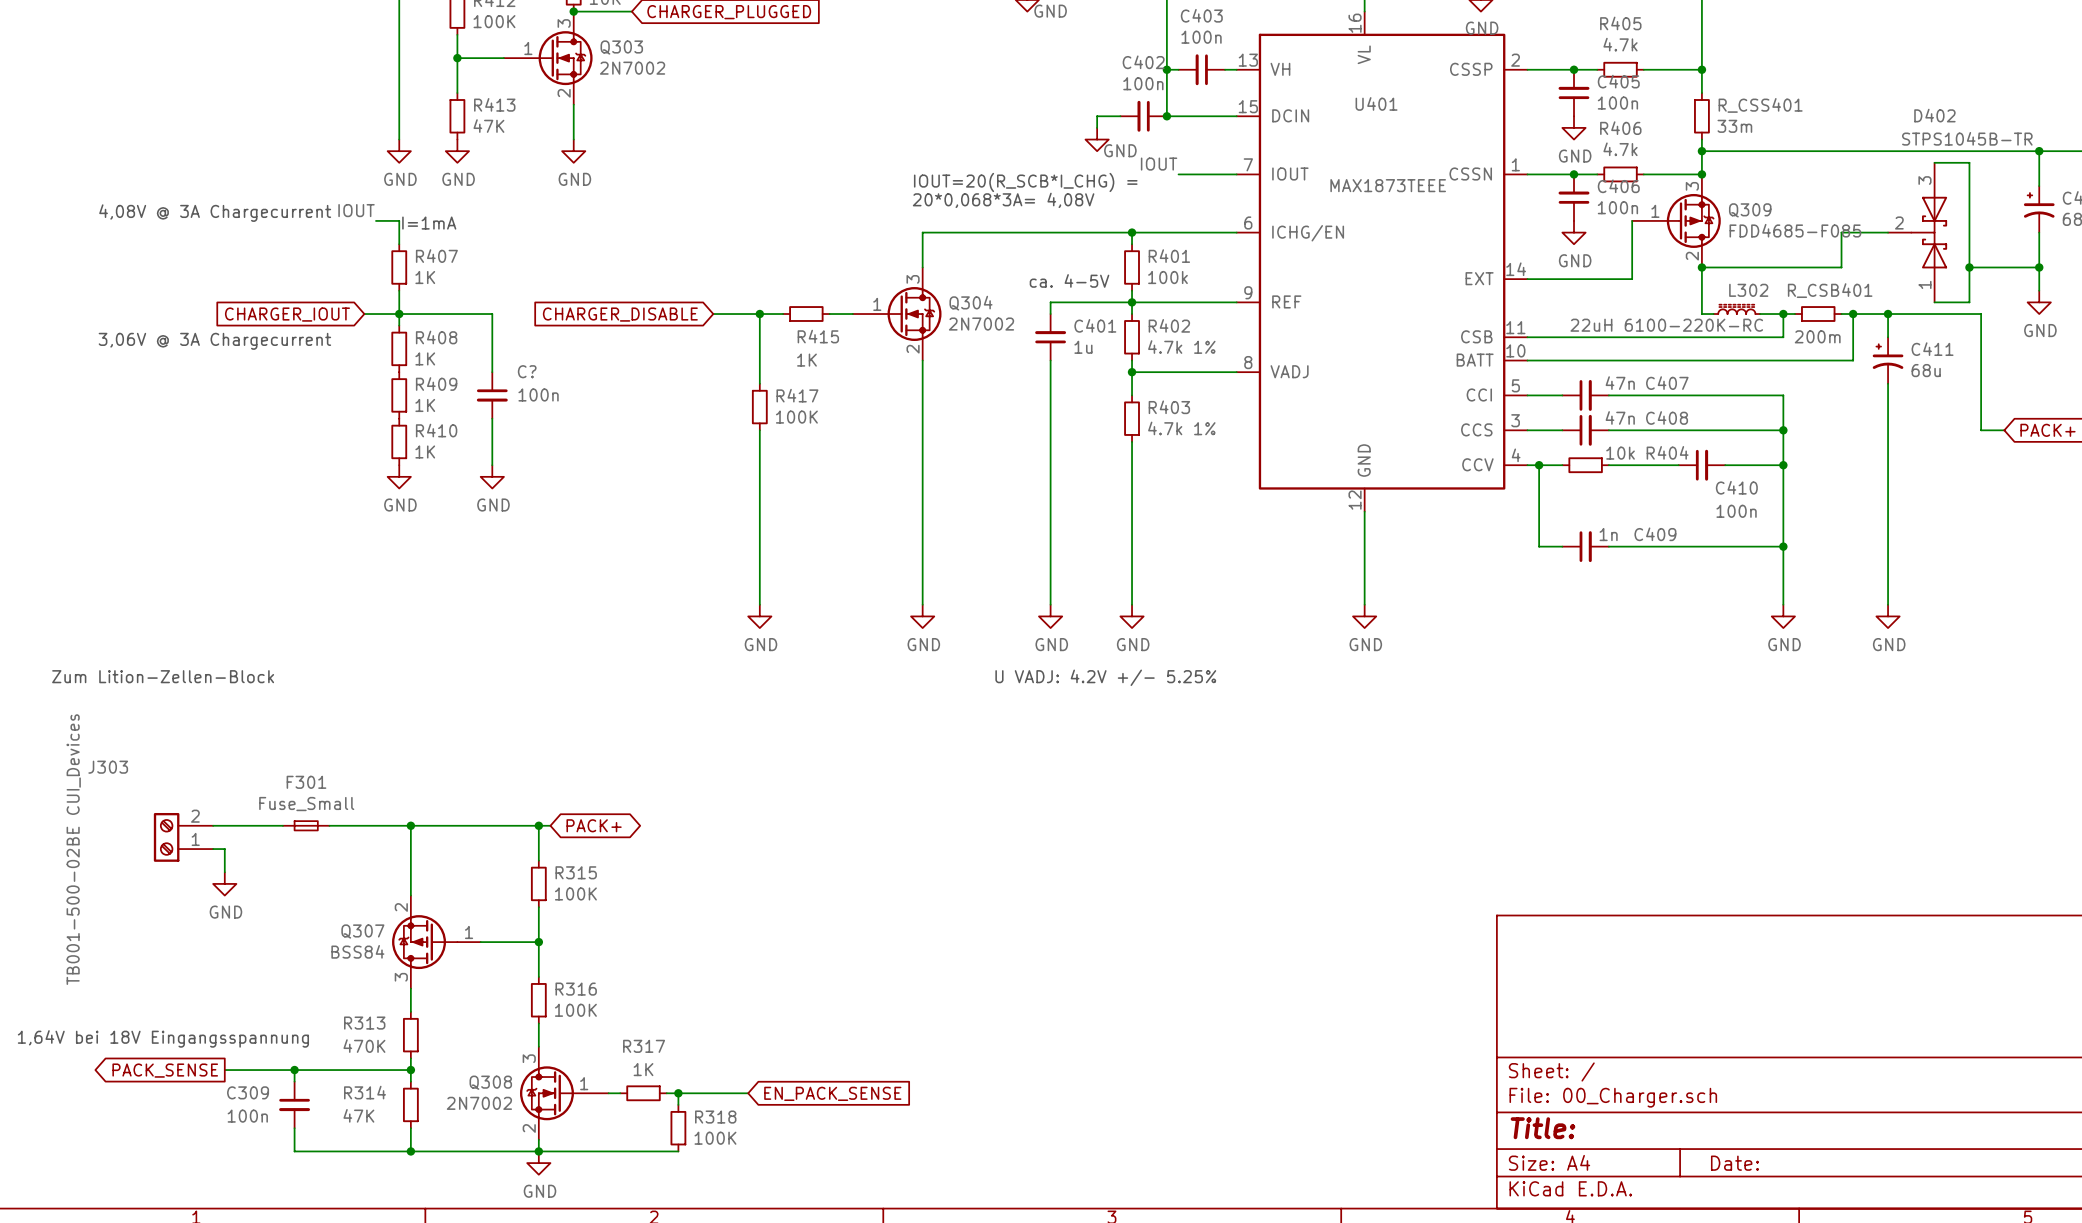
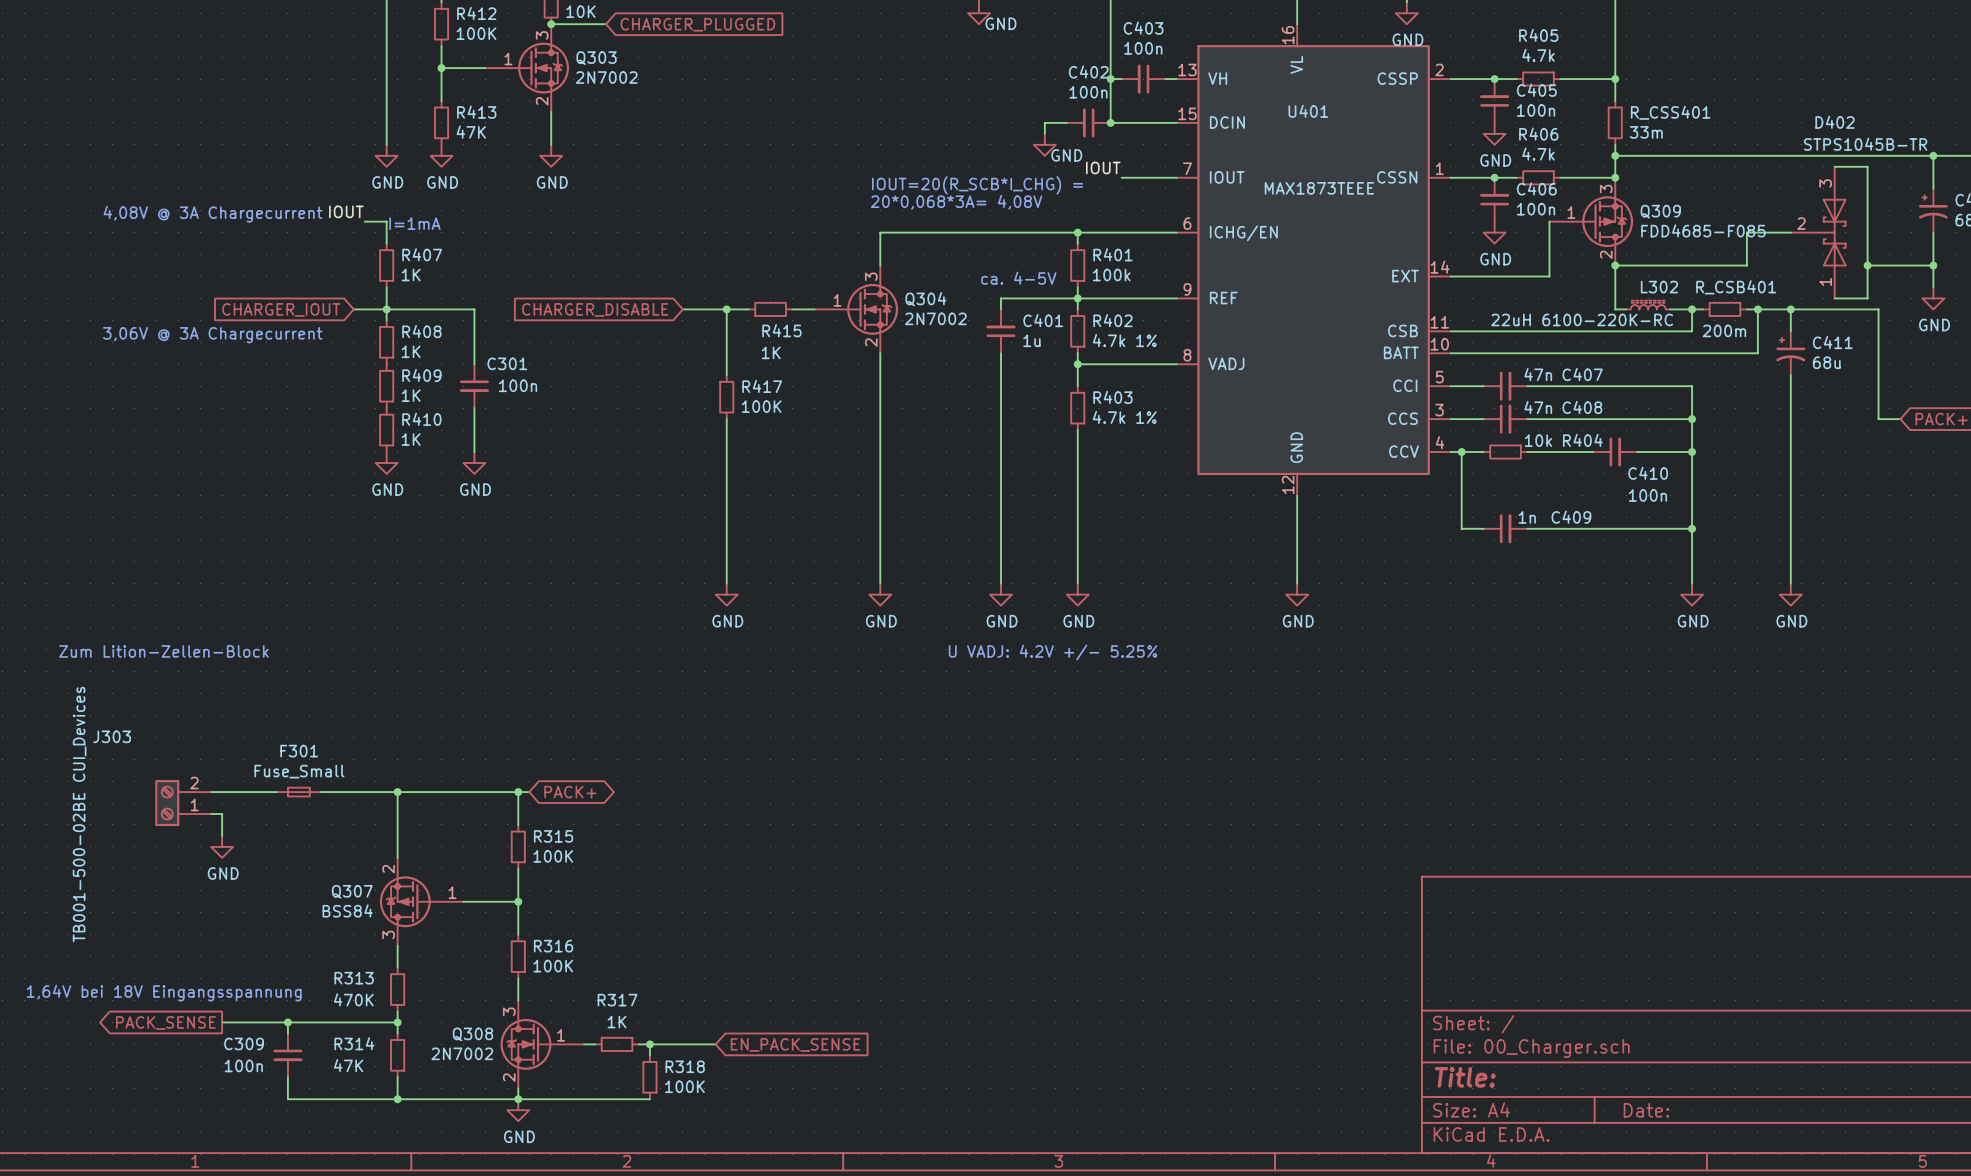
C? name: C? (527, 371) -> C301 (507, 363)

